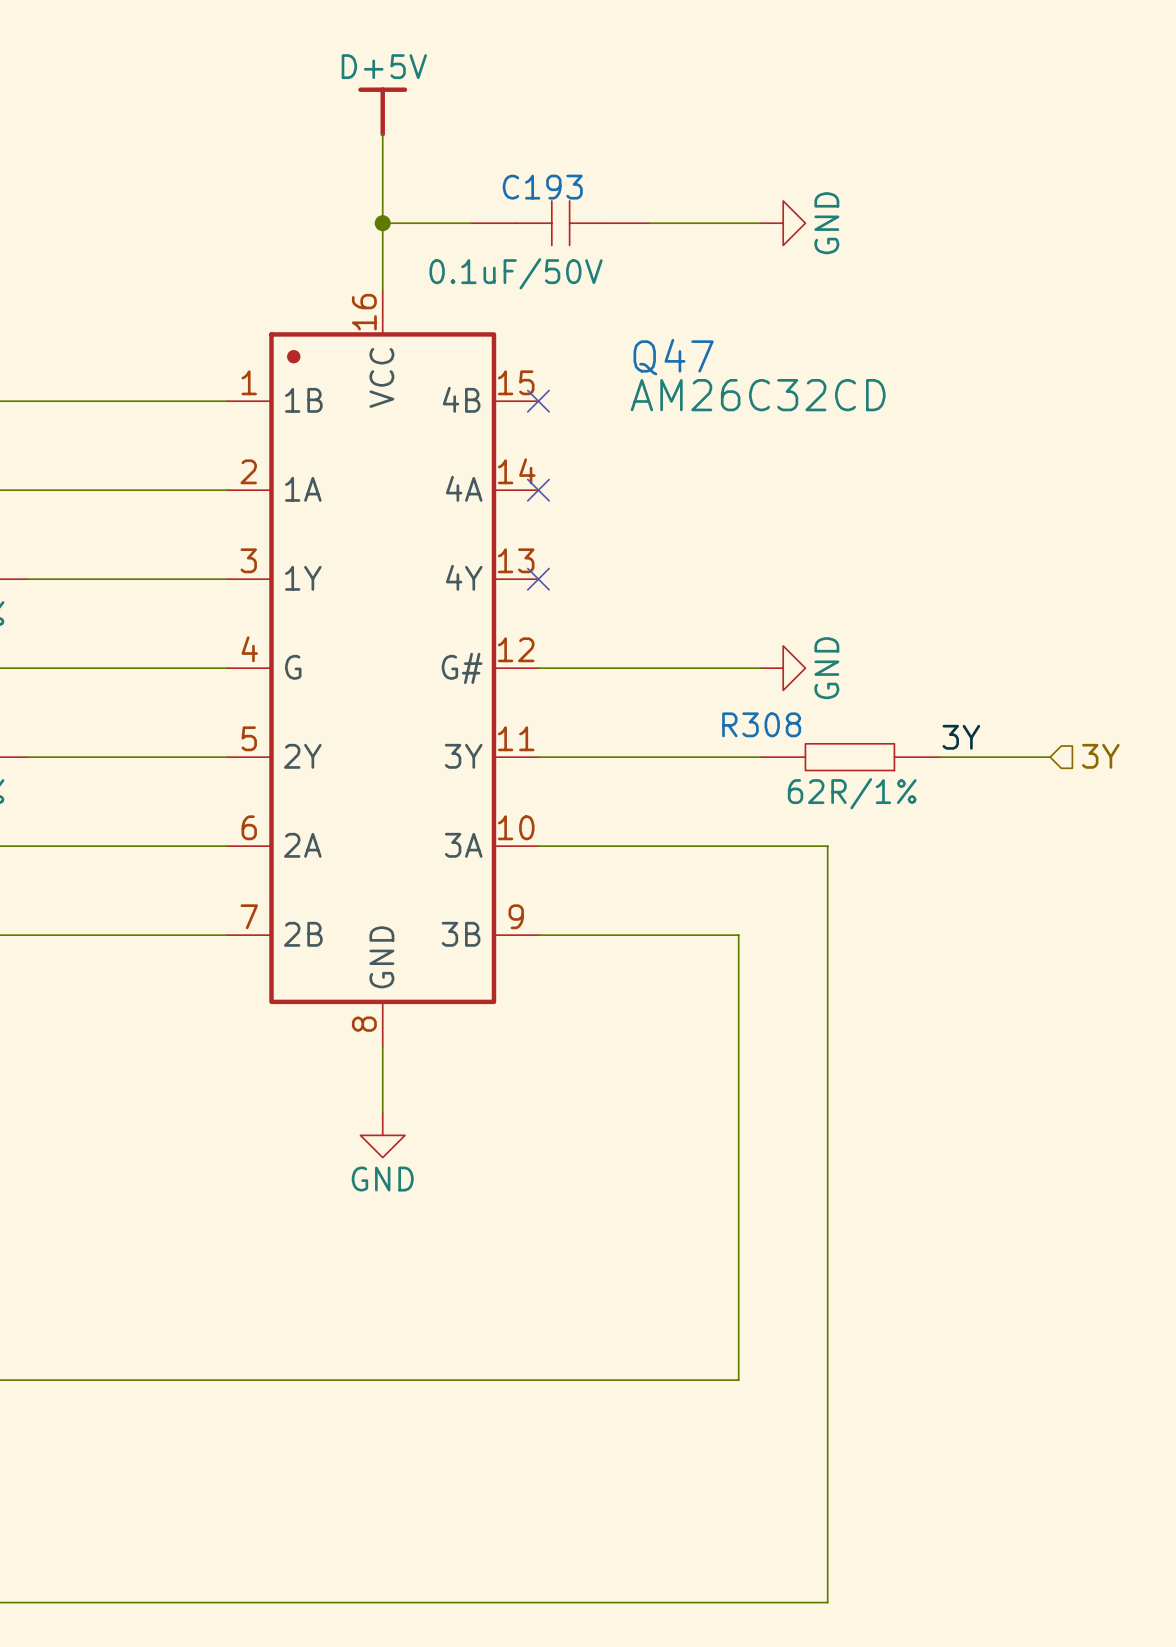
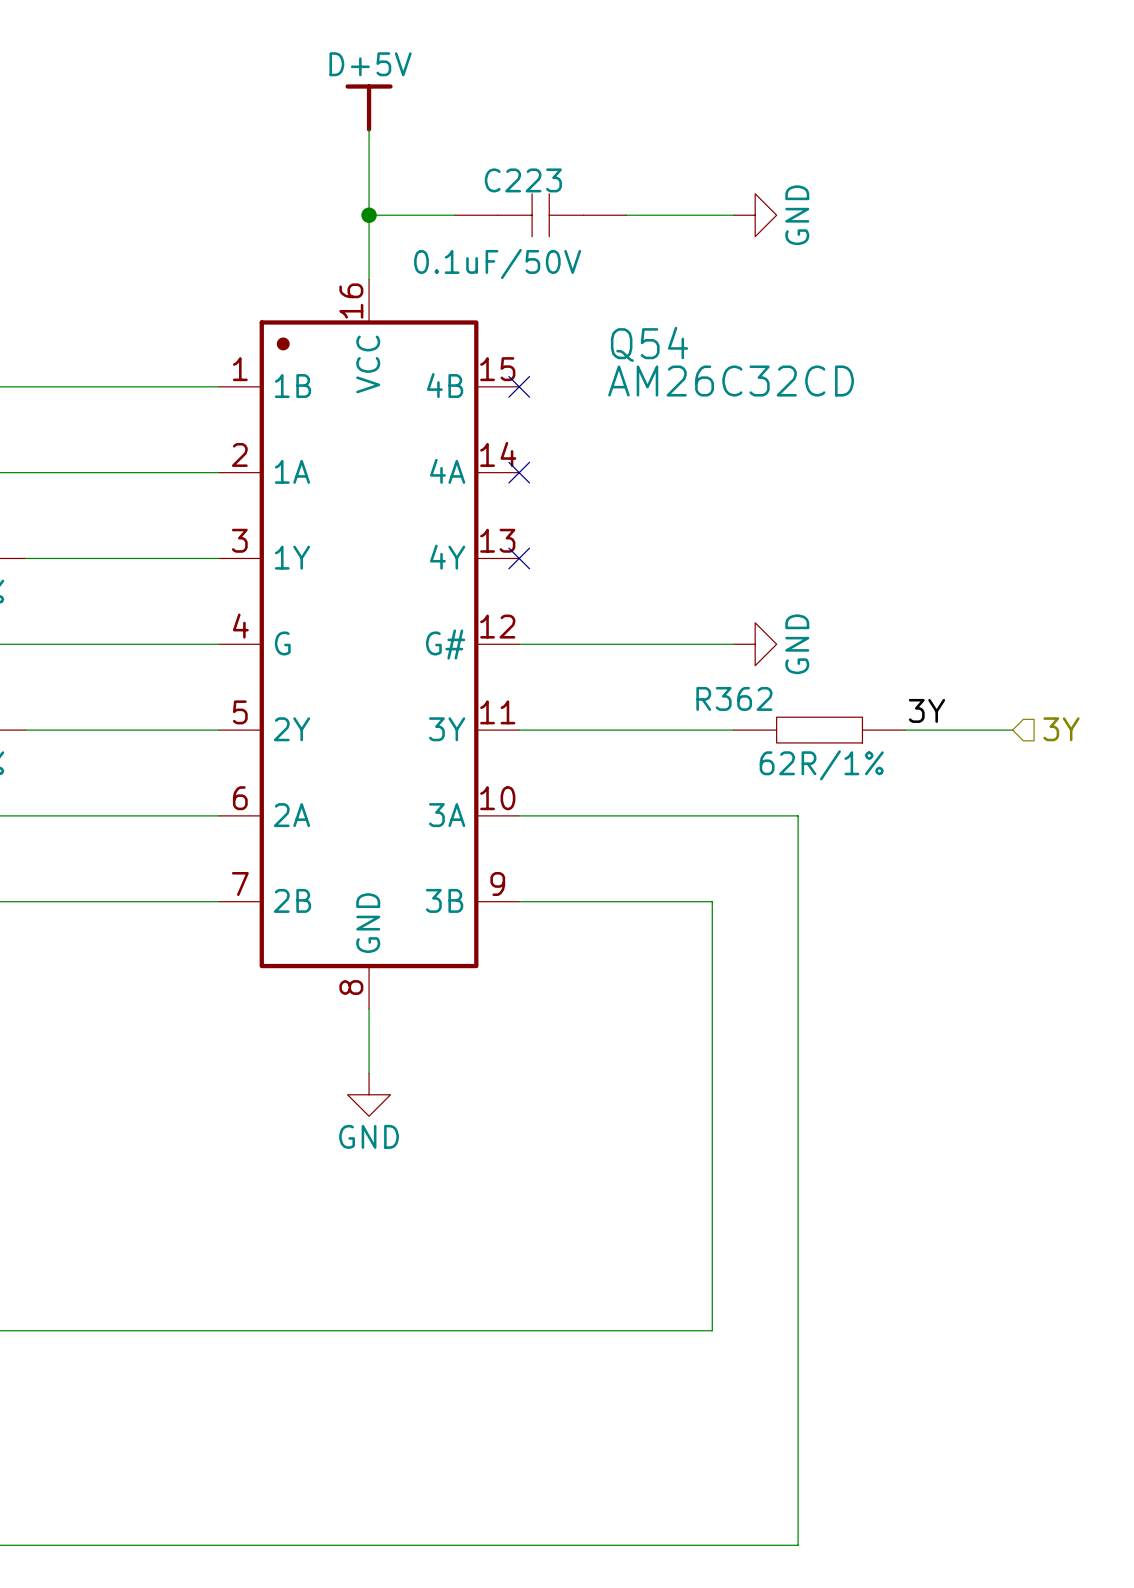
C193 name: C193 (542, 187) -> C223 (523, 180)
Q47 name: Q47 (673, 357) -> Q54 (649, 344)
R308 name: R308 (761, 724) -> R362 (734, 698)

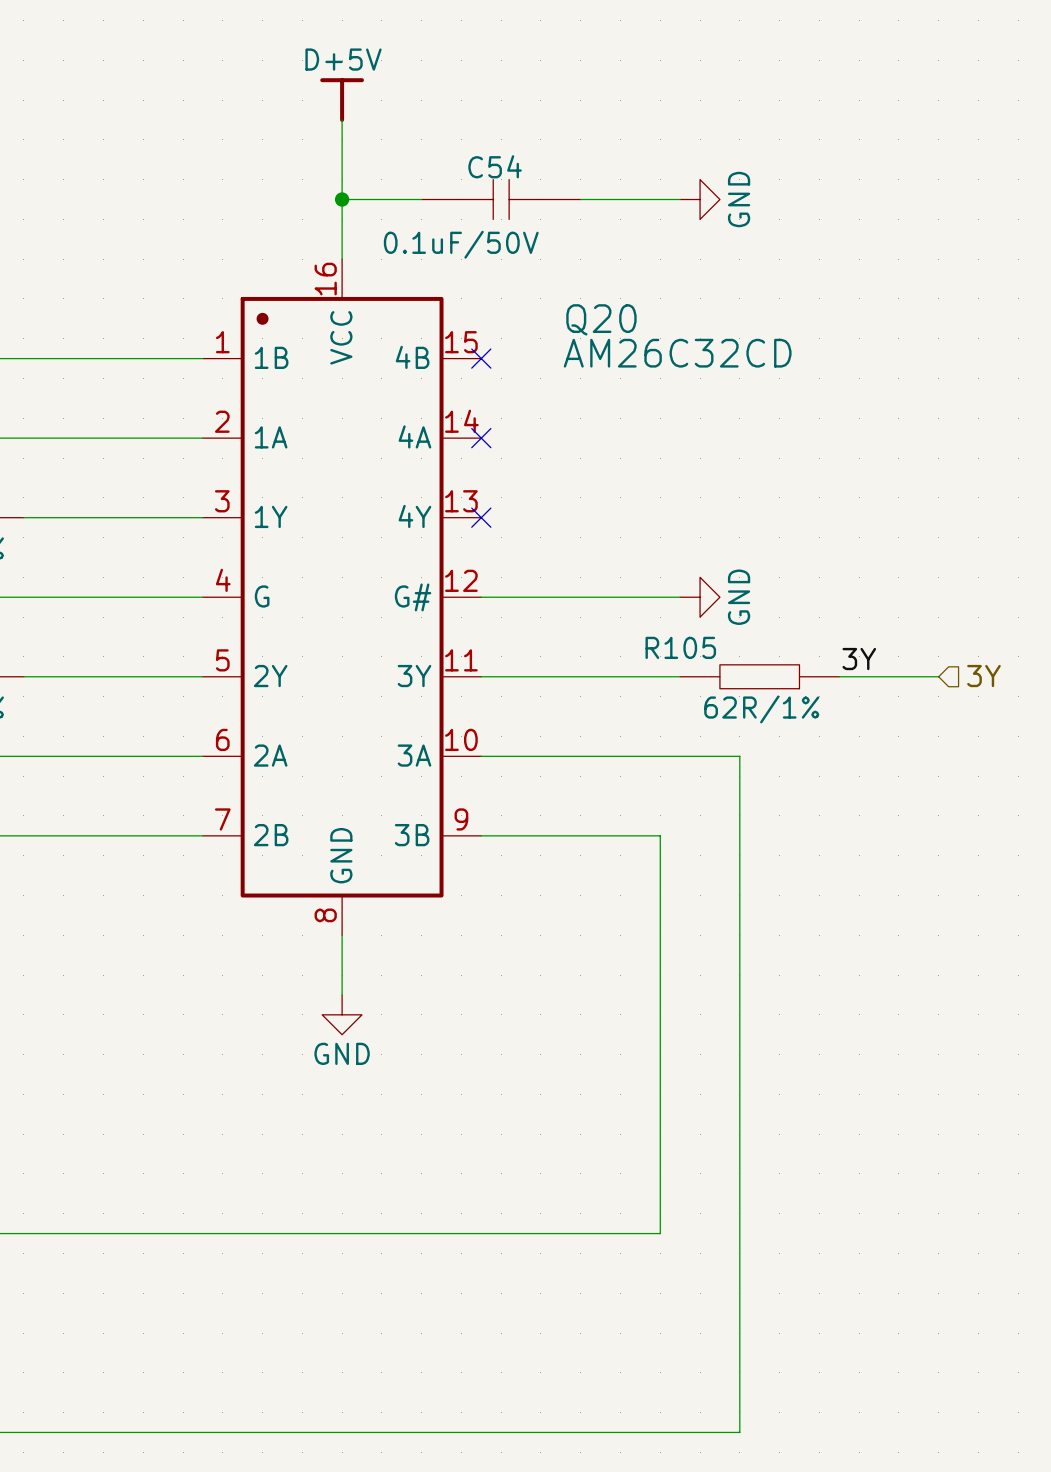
C223 name: C223 (523, 180) -> C54 (495, 166)
Q54 name: Q54 (649, 344) -> Q20 (601, 319)
R362 name: R362 (734, 698) -> R105 (680, 647)

